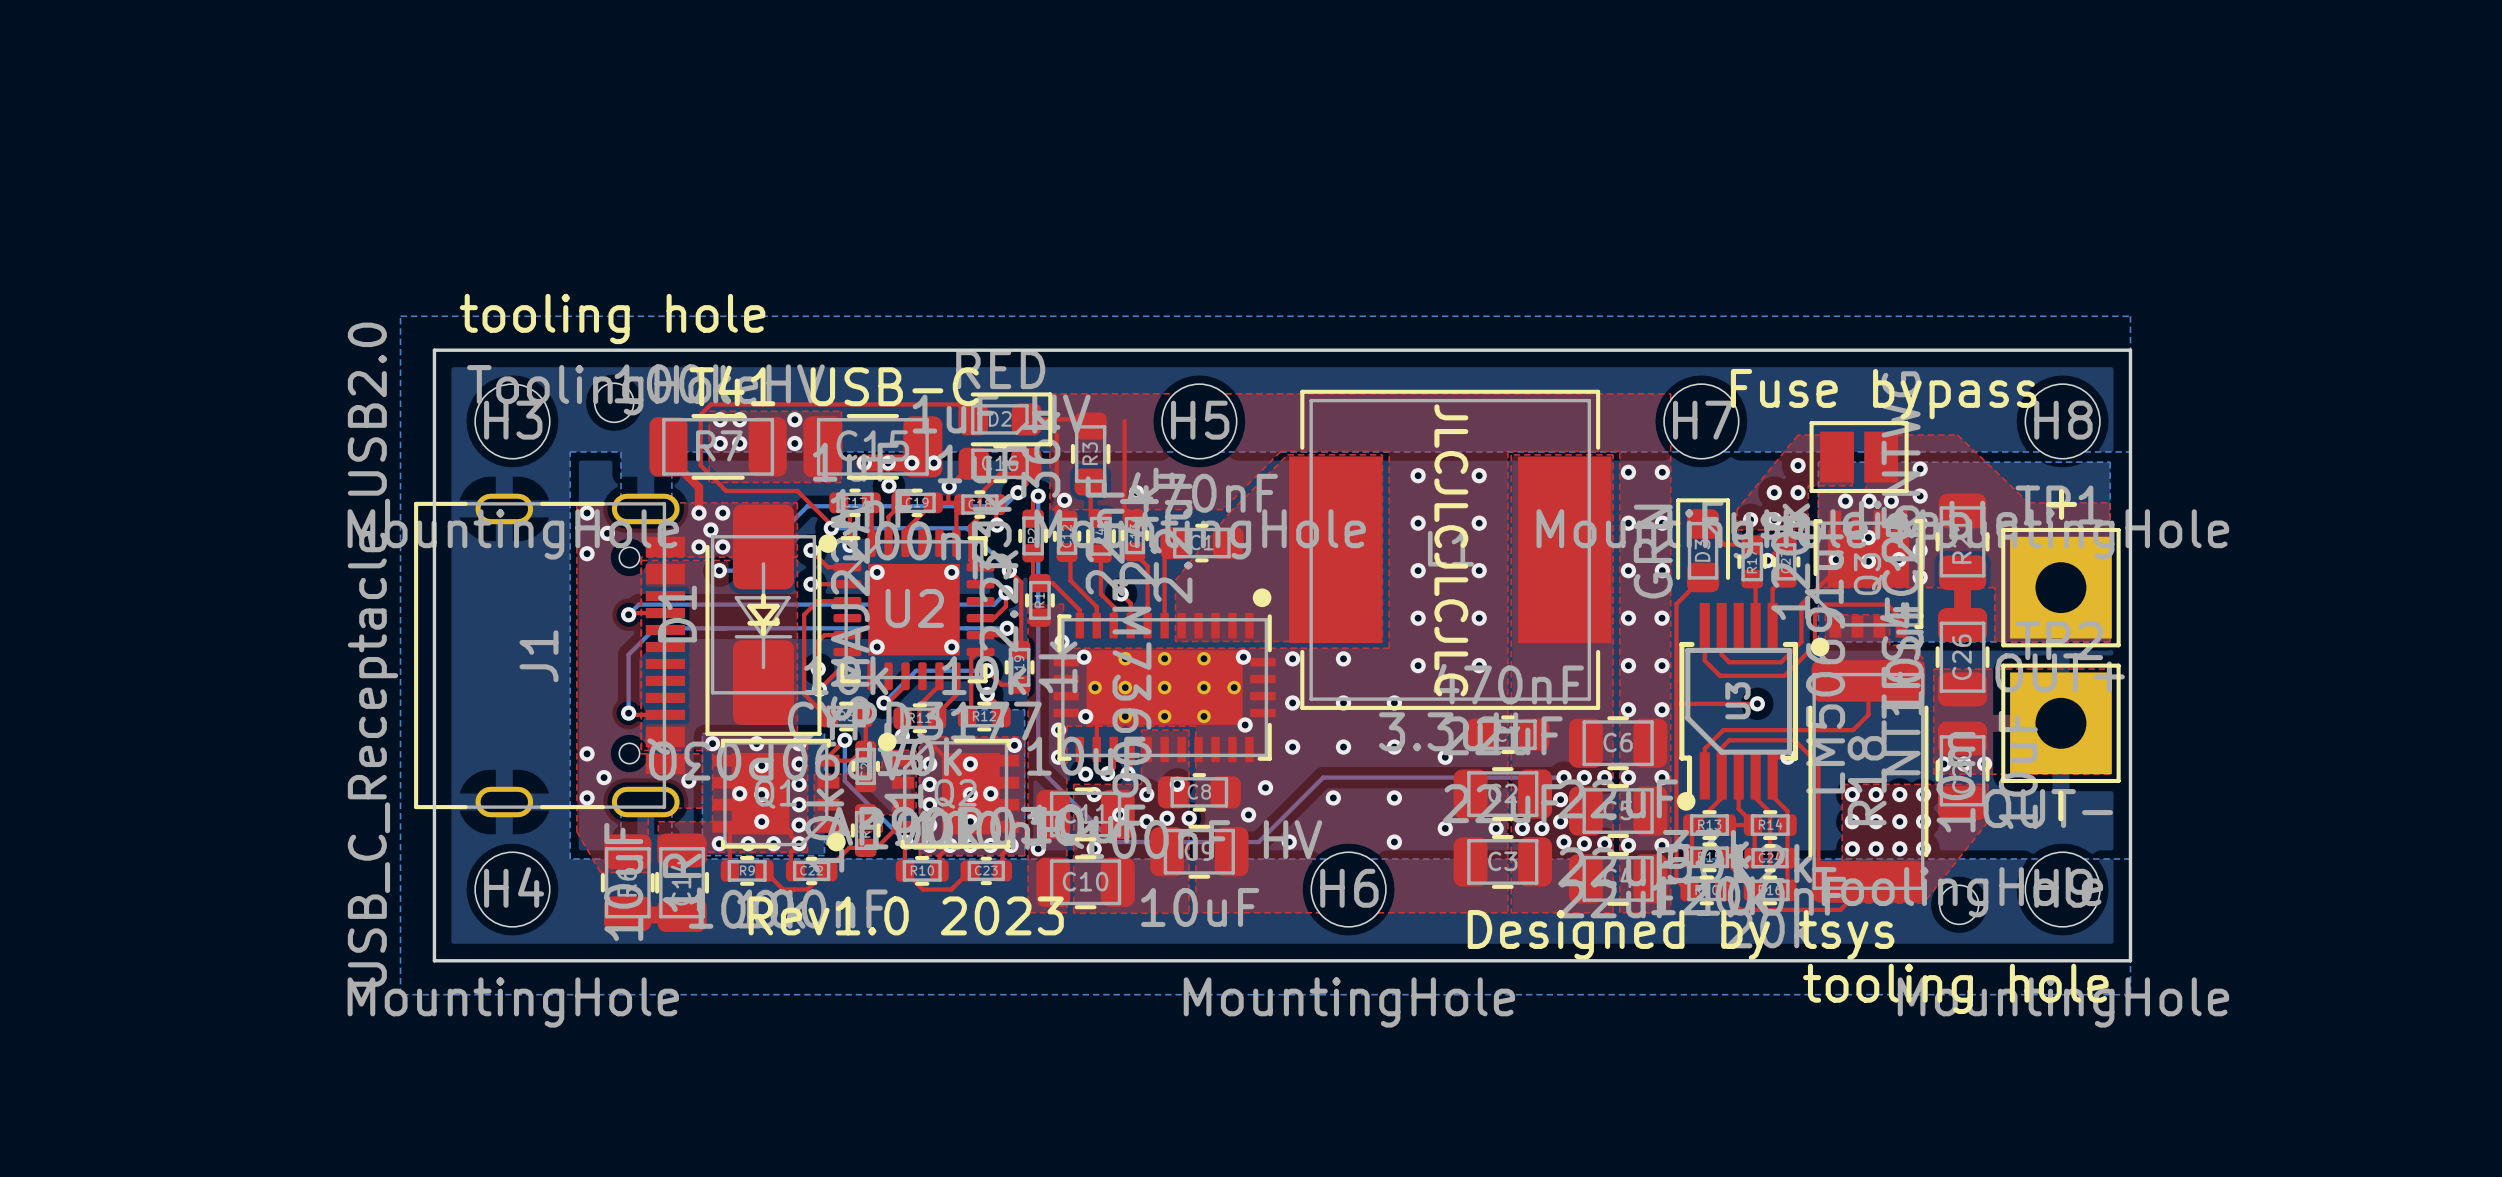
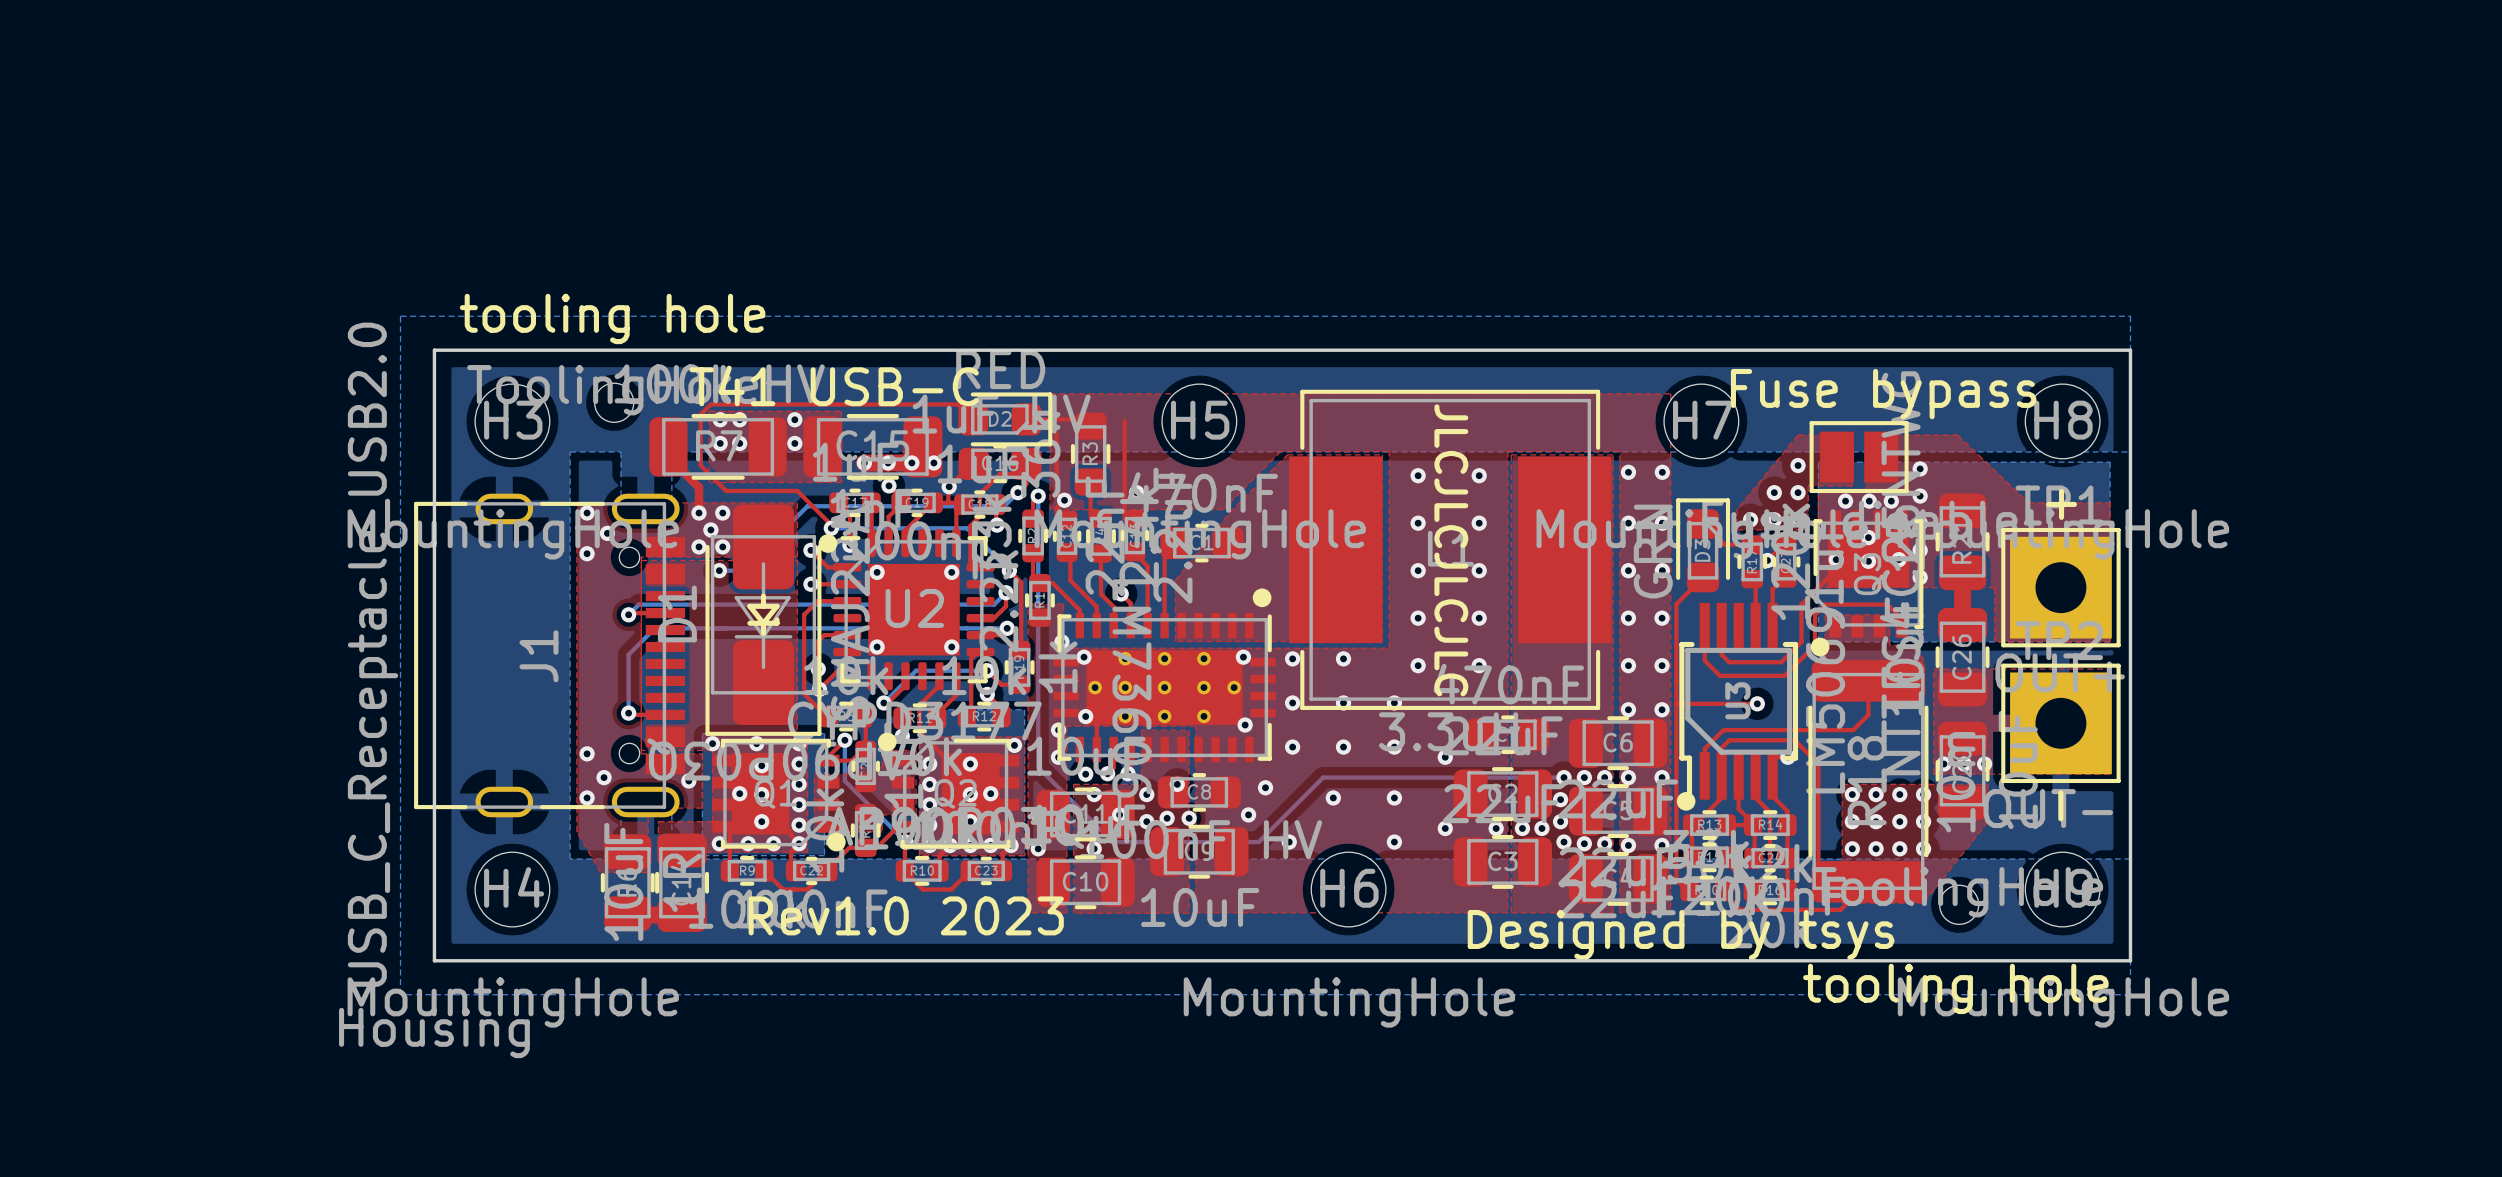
drawing: none -> [339, 1007, 530, 1059]

